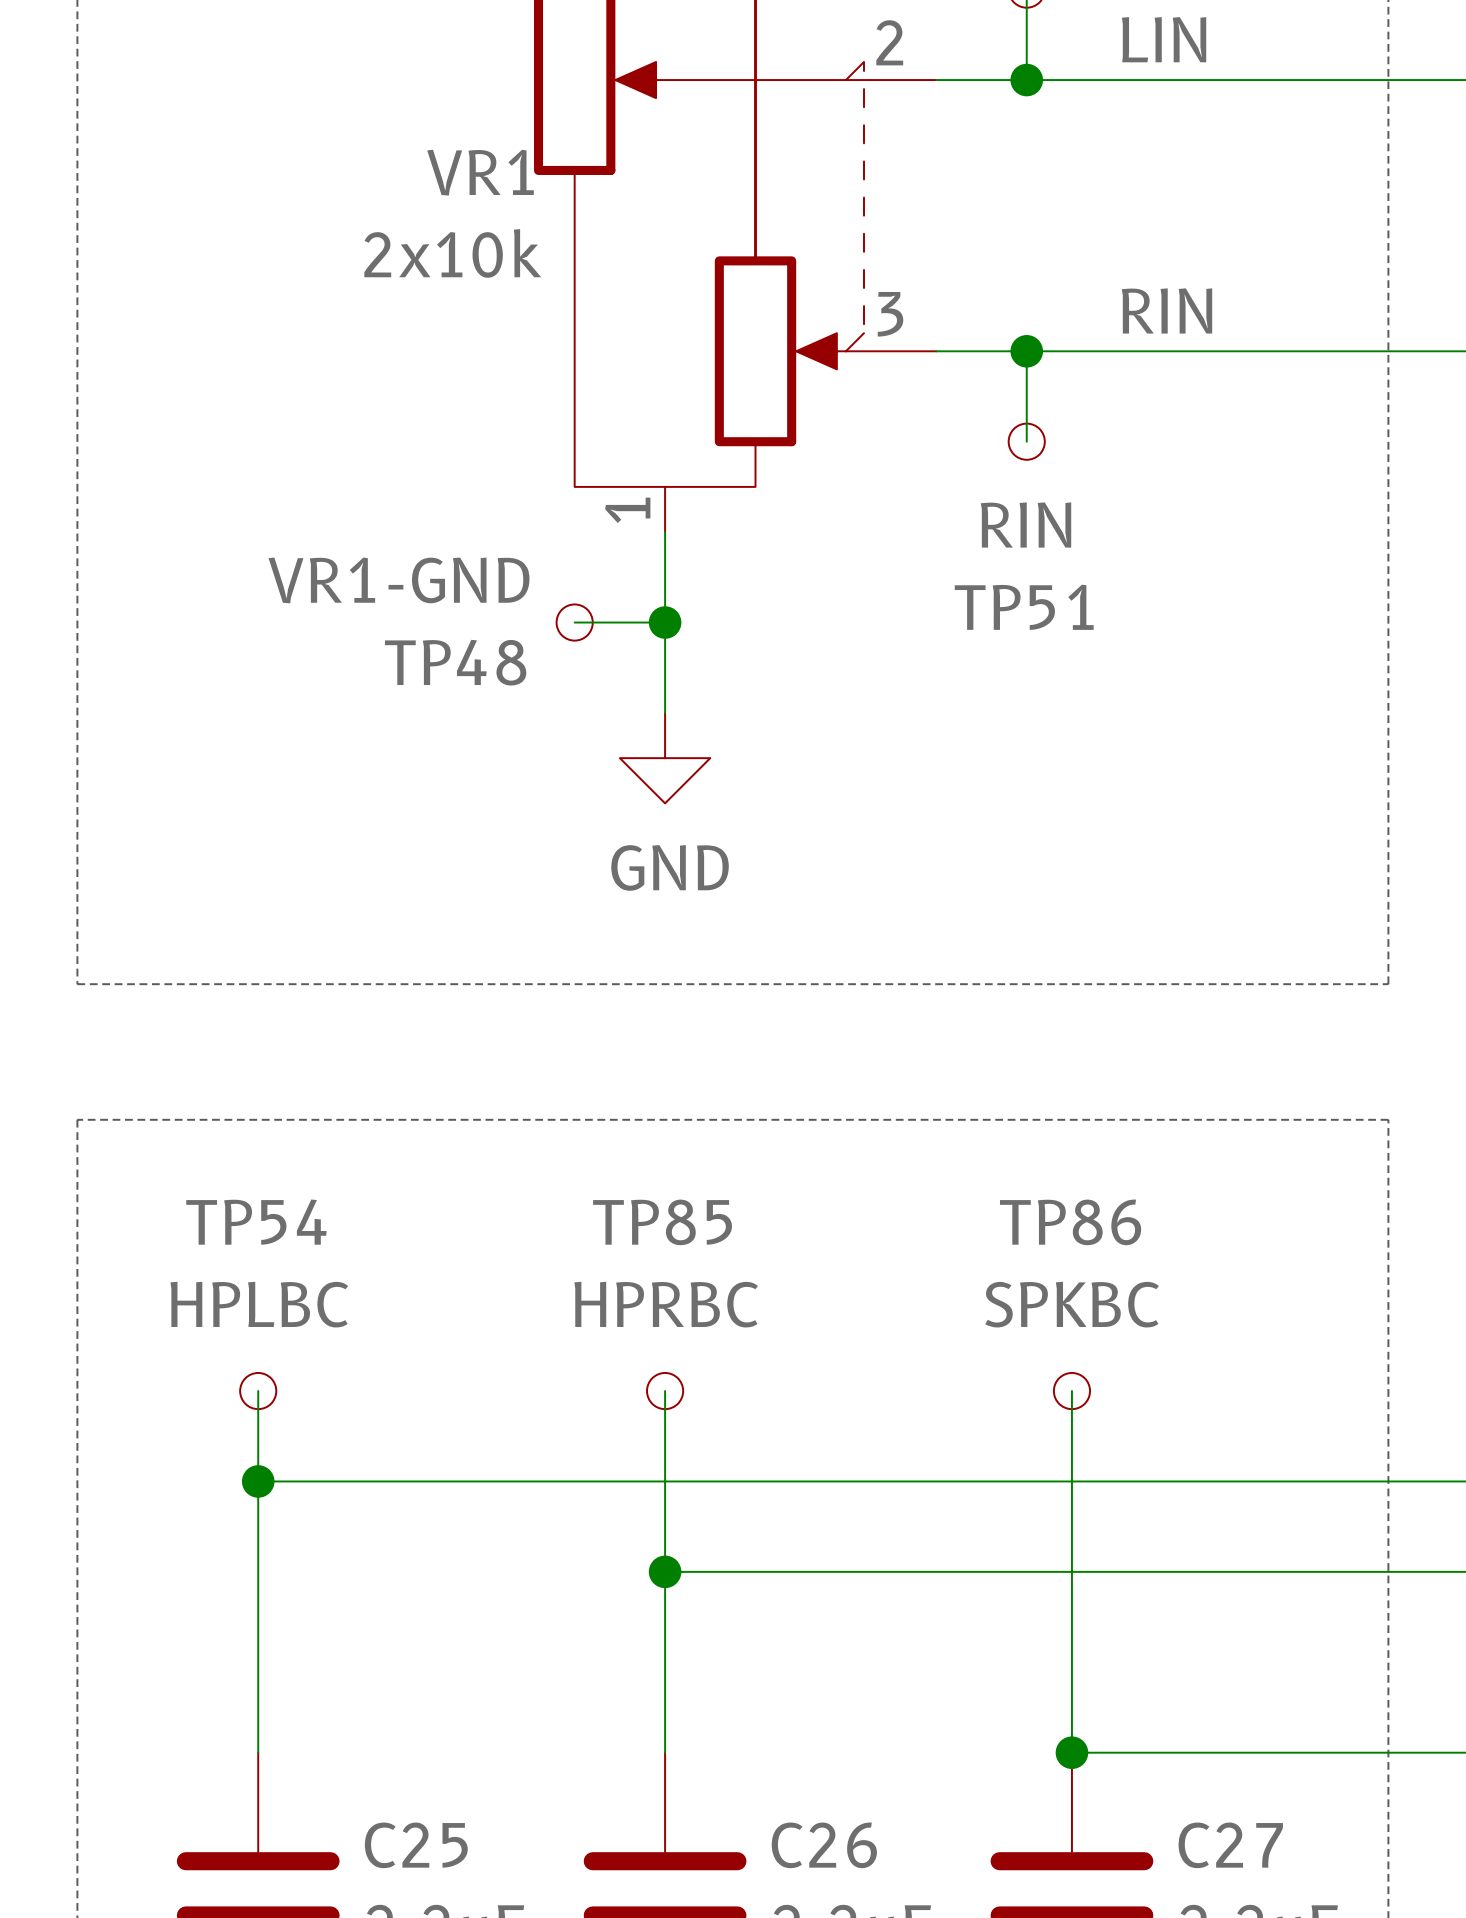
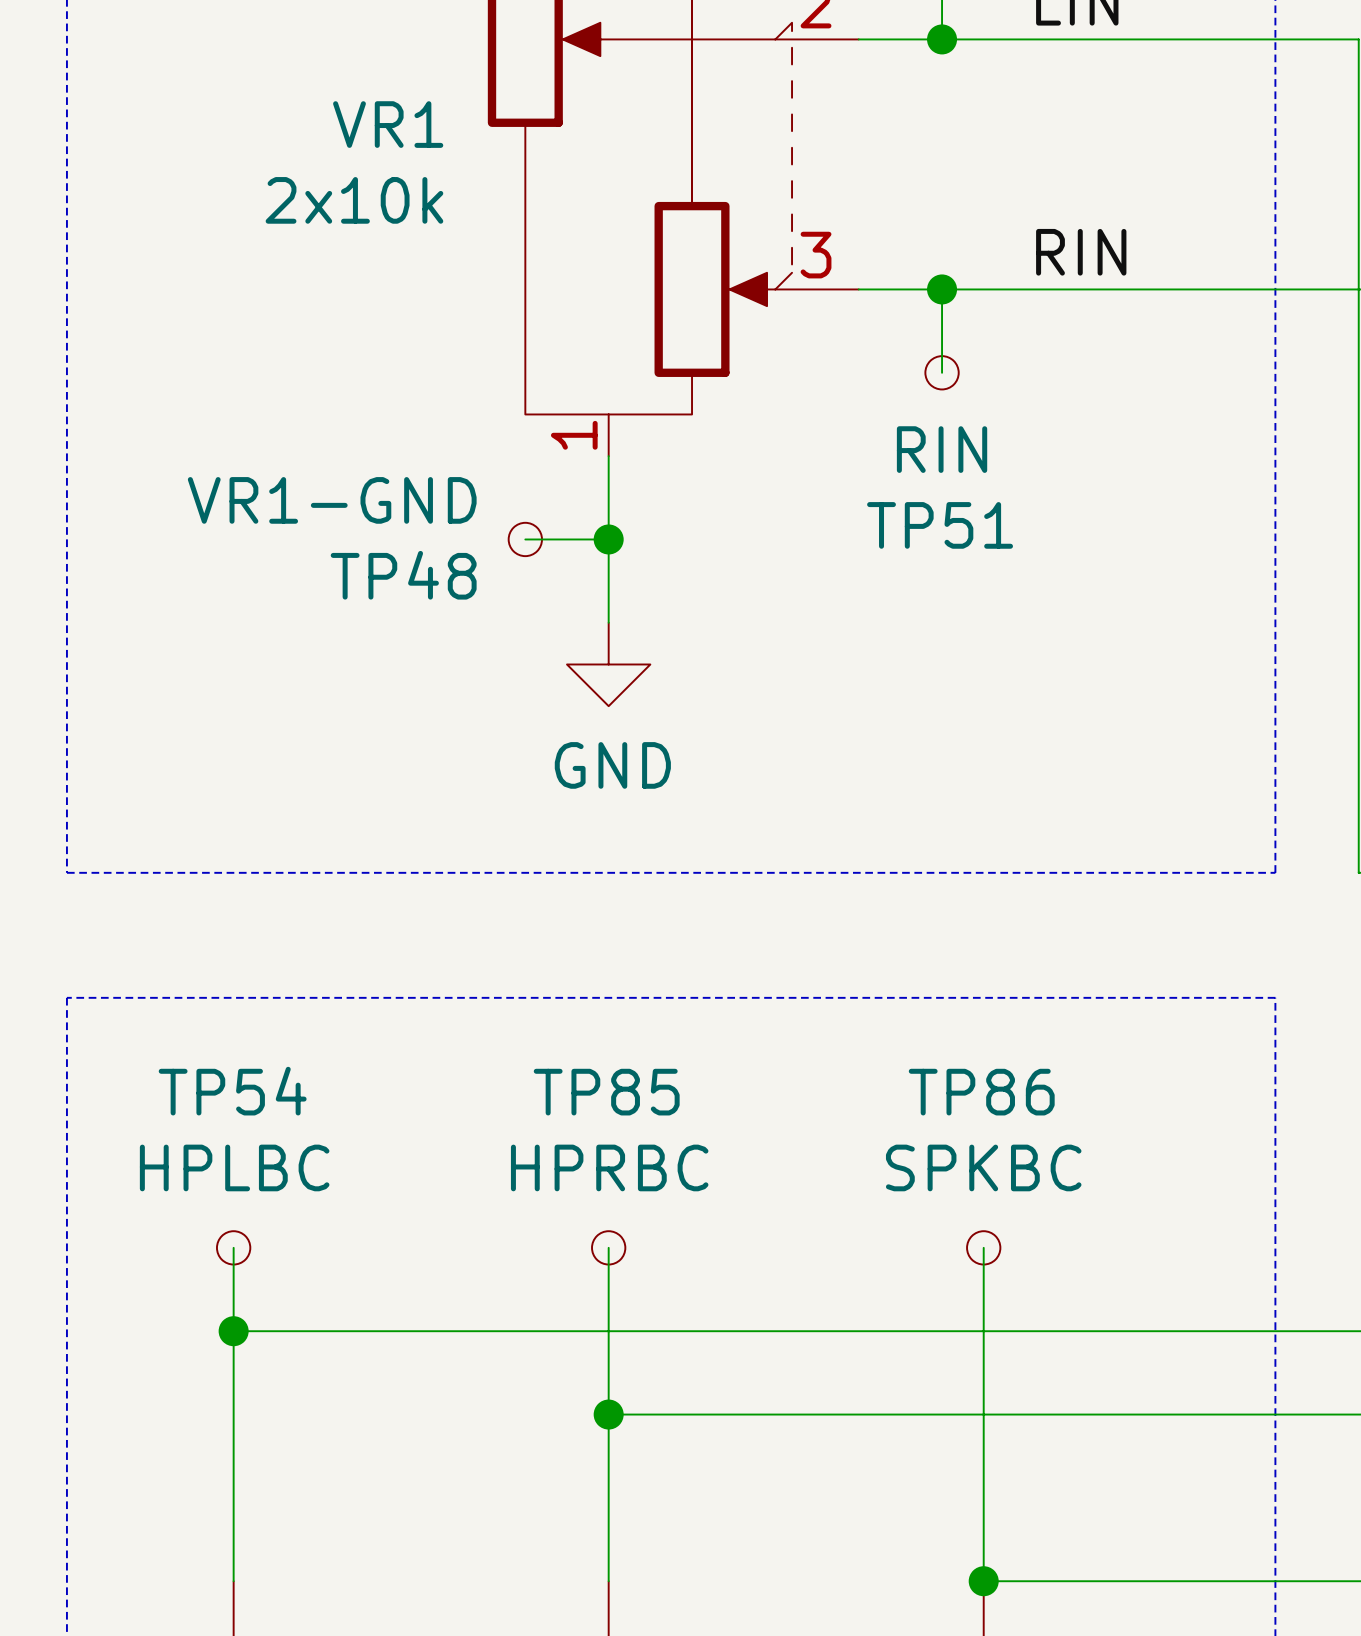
VR1 name position: VR1 (480, 172) -> VR1 (388, 124)
VR1 value position: 2x10k (452, 253) -> 2x10k (354, 200)

